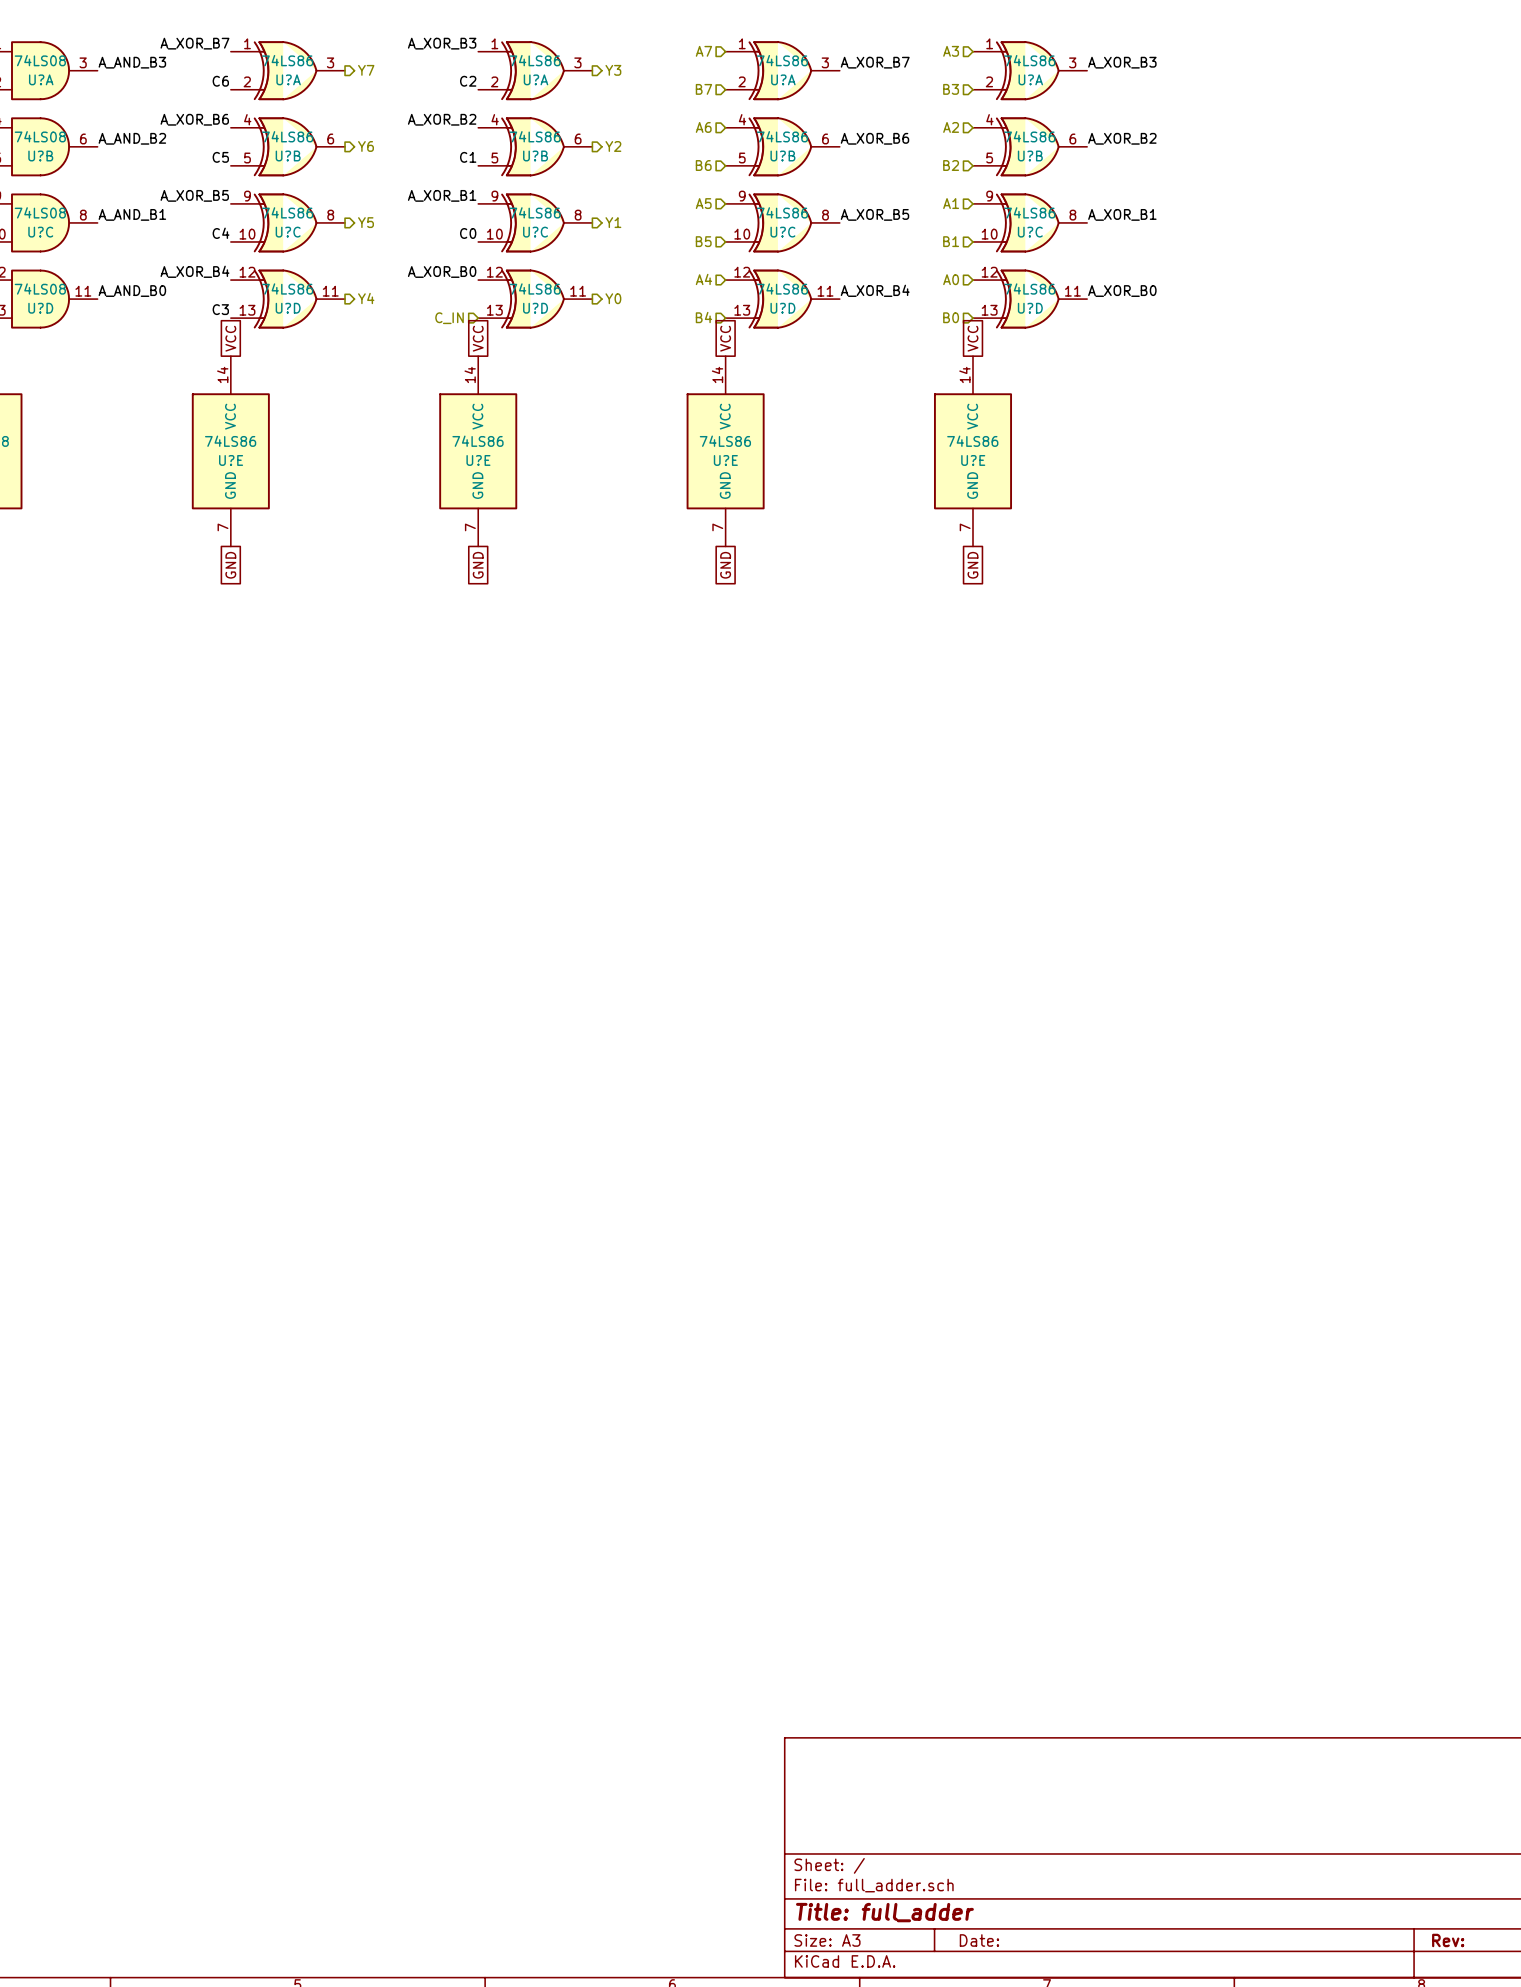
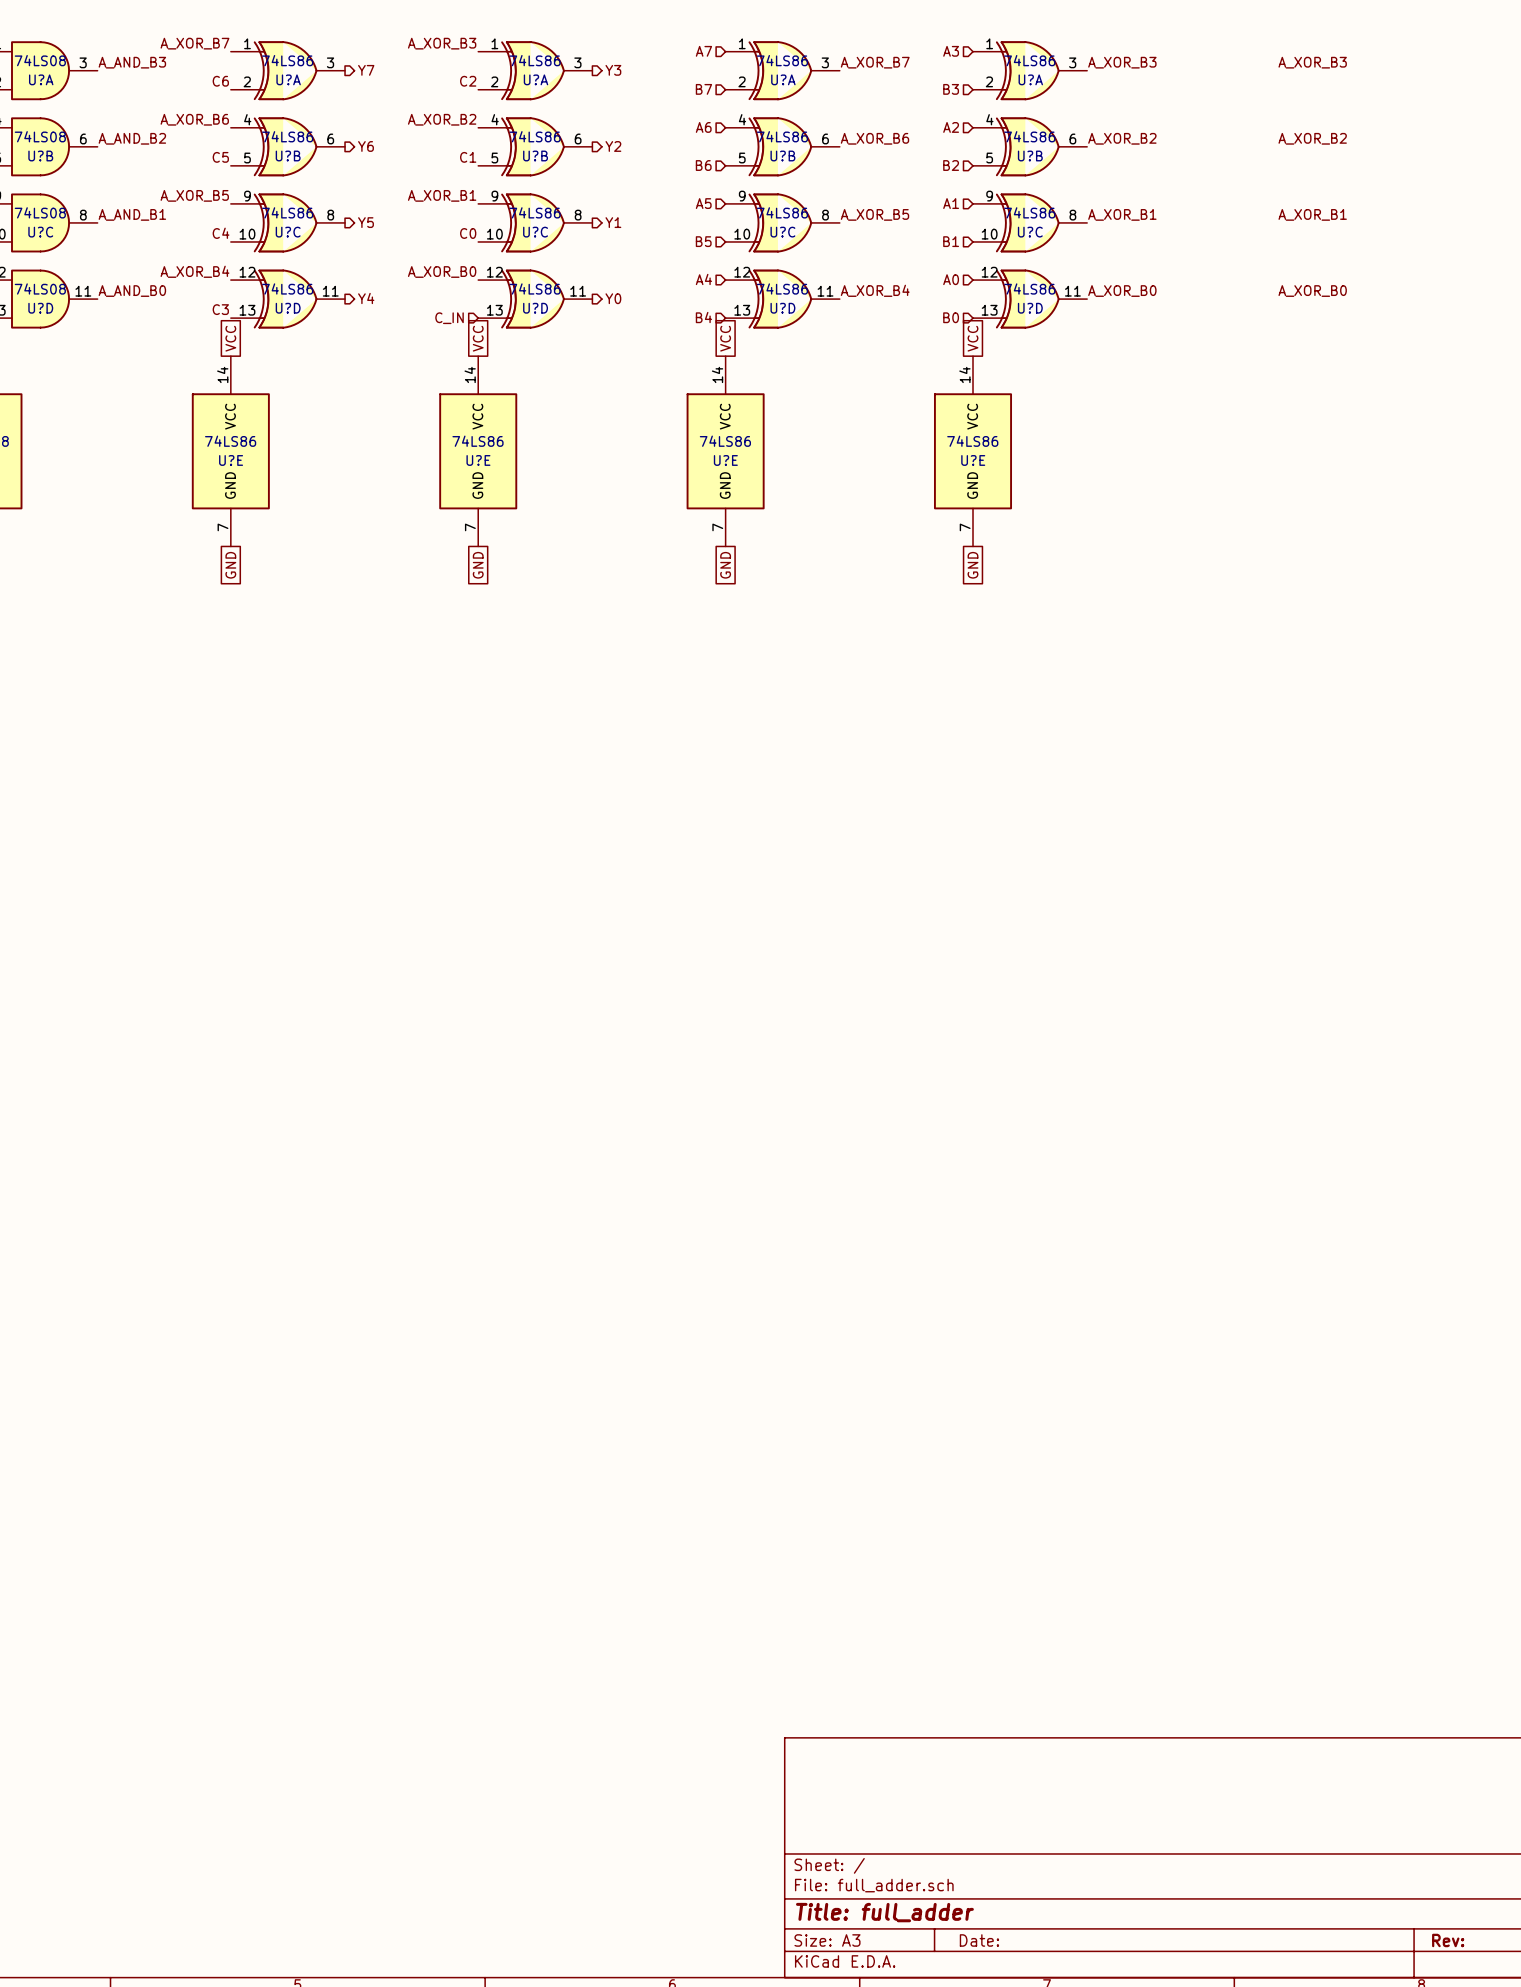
label: none -> A_XOR_B3 (1312, 62)
label: none -> A_XOR_B2 (1312, 138)
label: none -> A_XOR_B1 (1312, 214)
label: none -> A_XOR_B0 (1312, 291)

